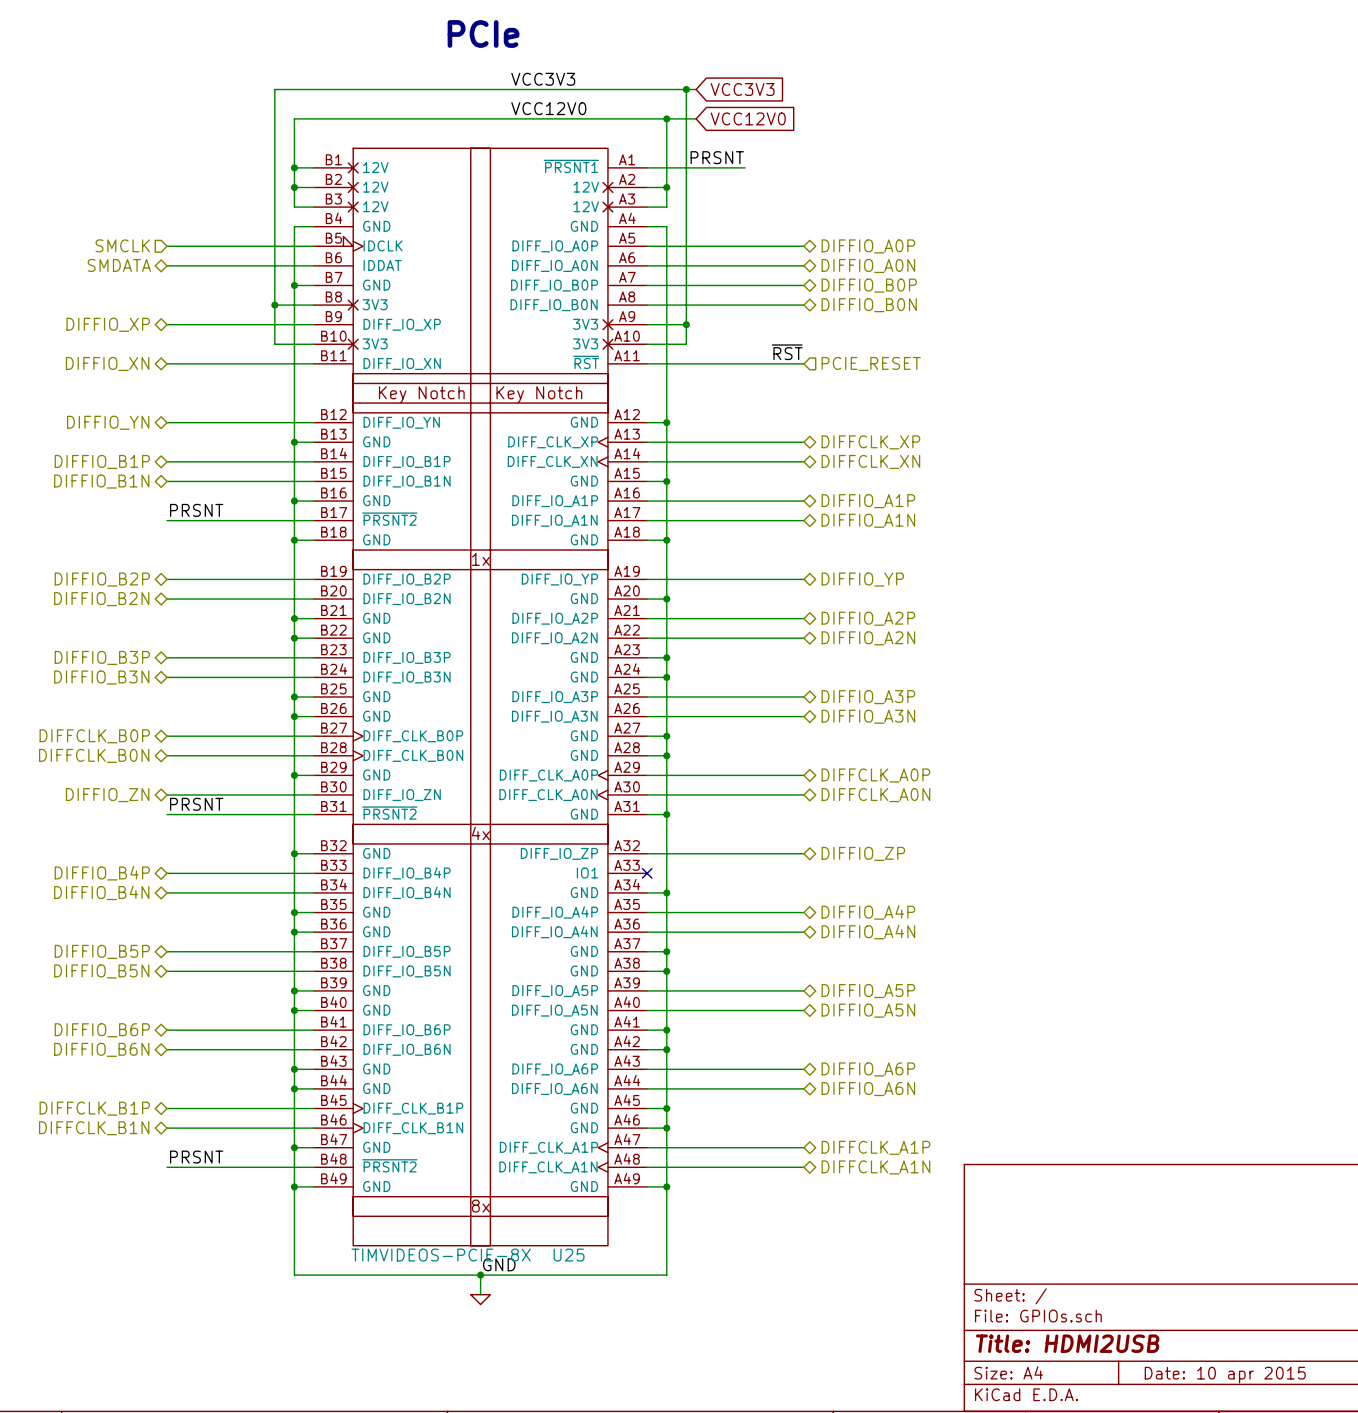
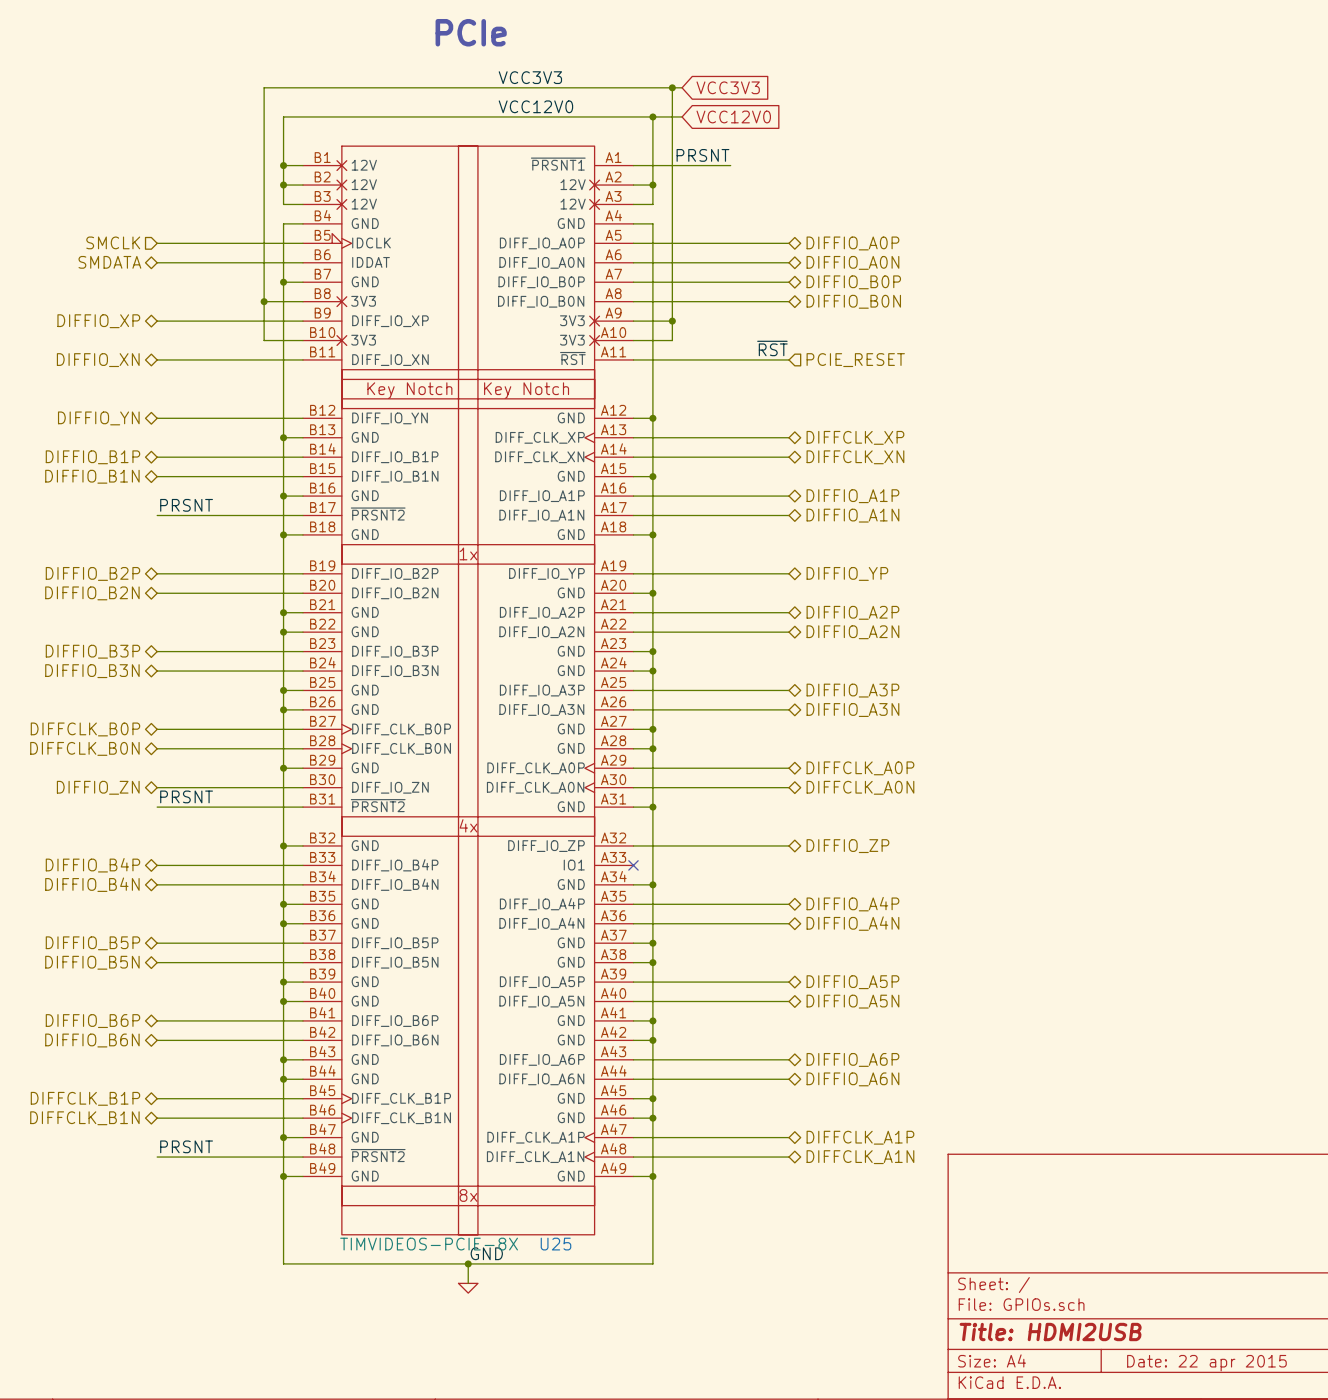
title block: Date: 10 apr 2015 (1225, 1375) -> Date: 22 apr 2015 (1206, 1363)

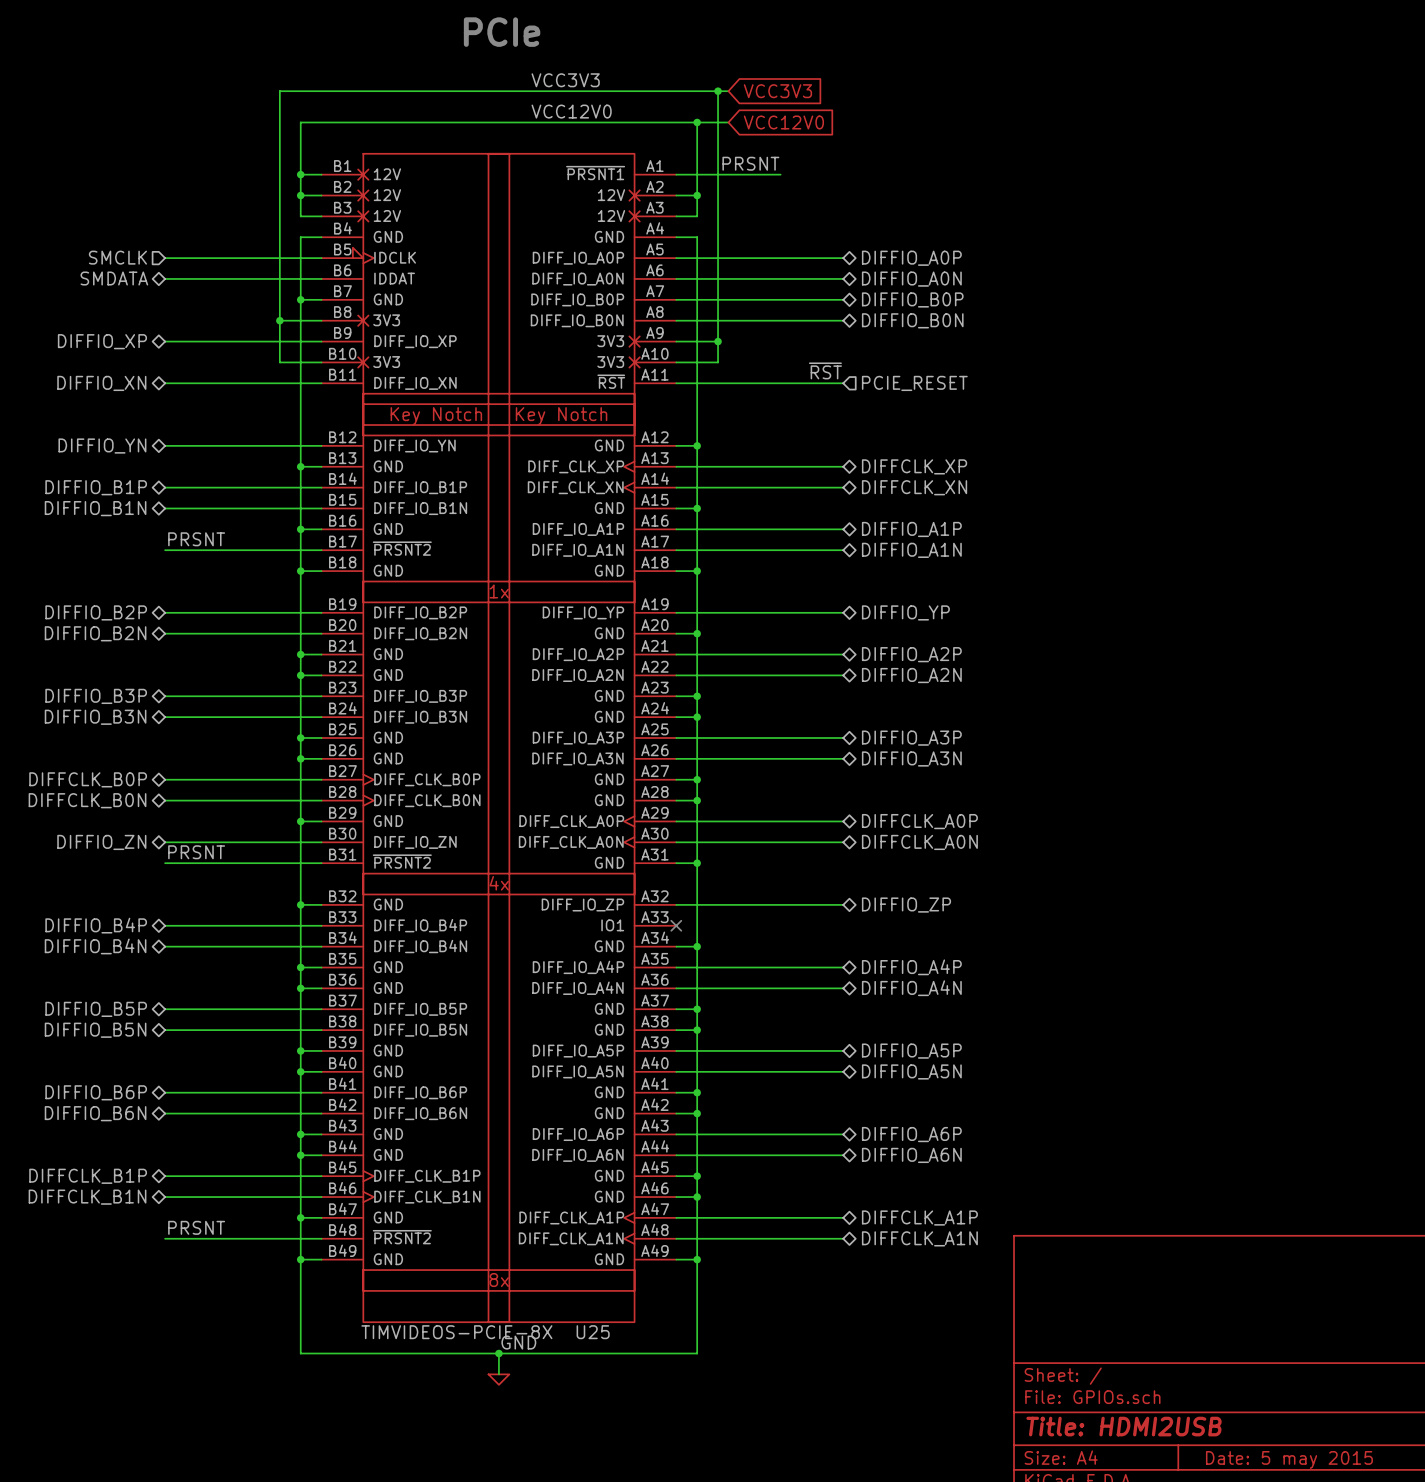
title block: Date: 22 apr 2015 (1206, 1363) -> Date: 5 may 2015 (1289, 1459)

